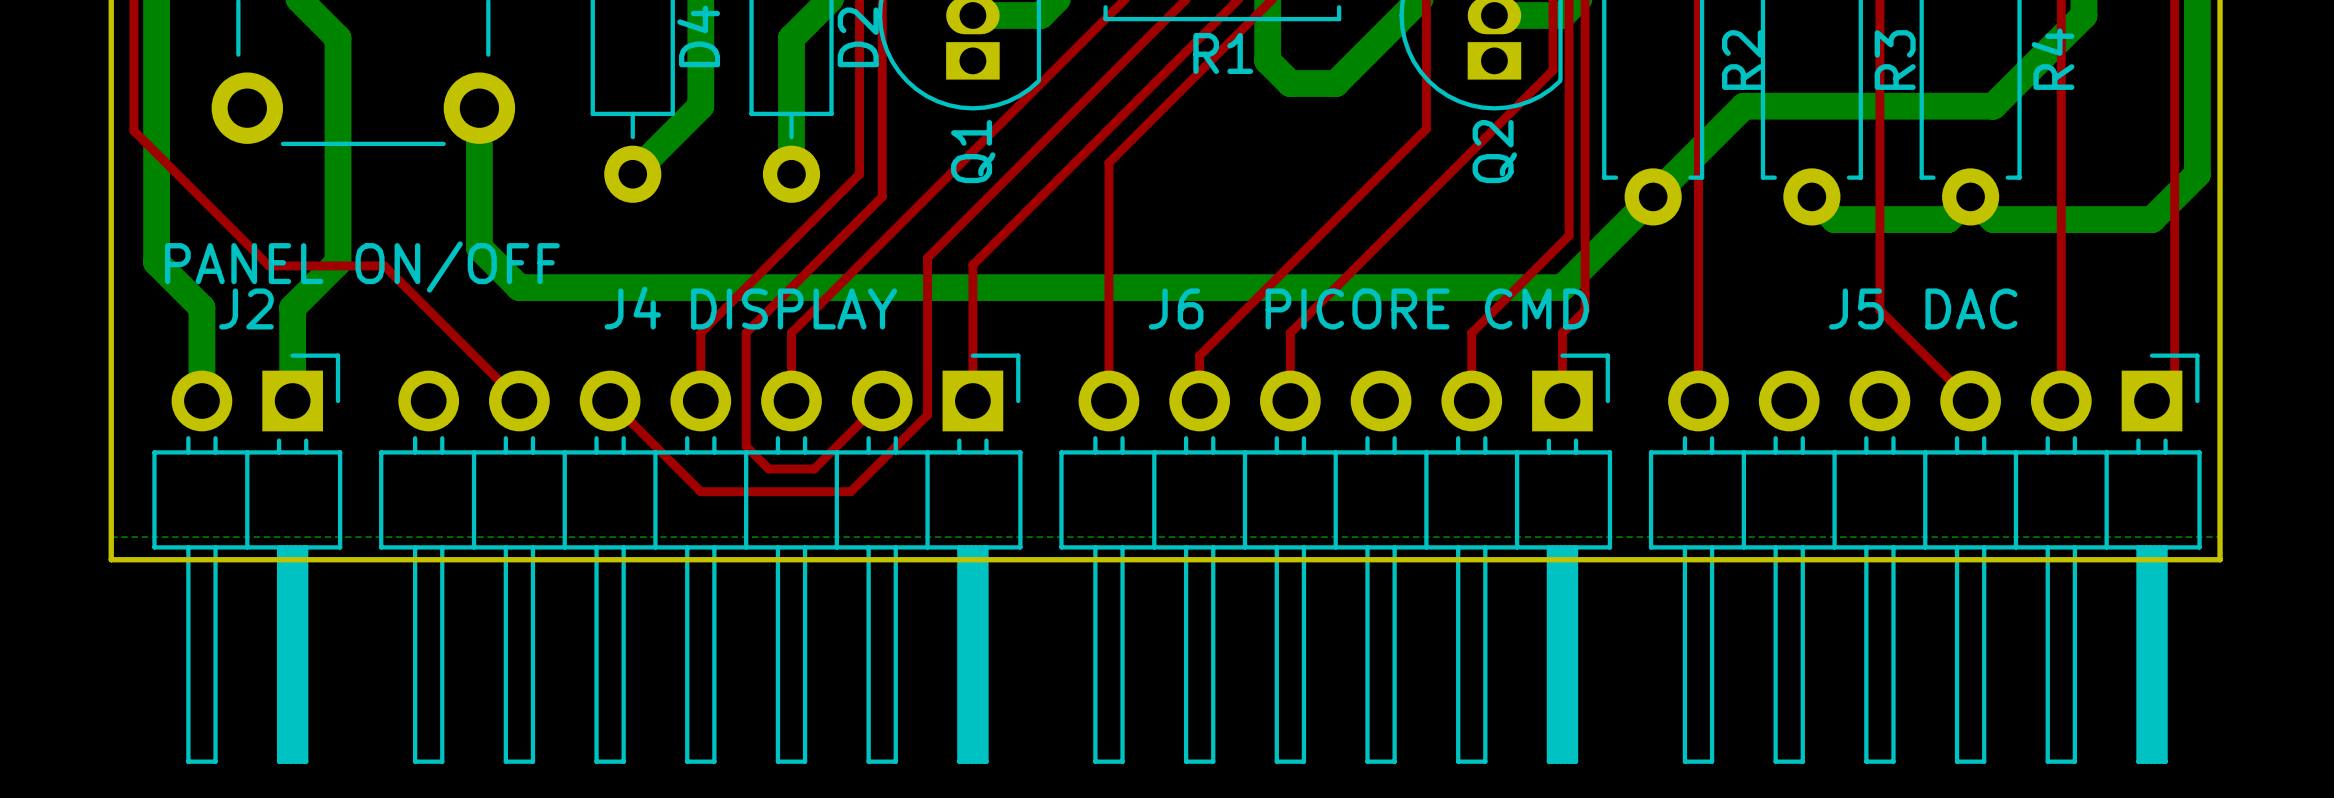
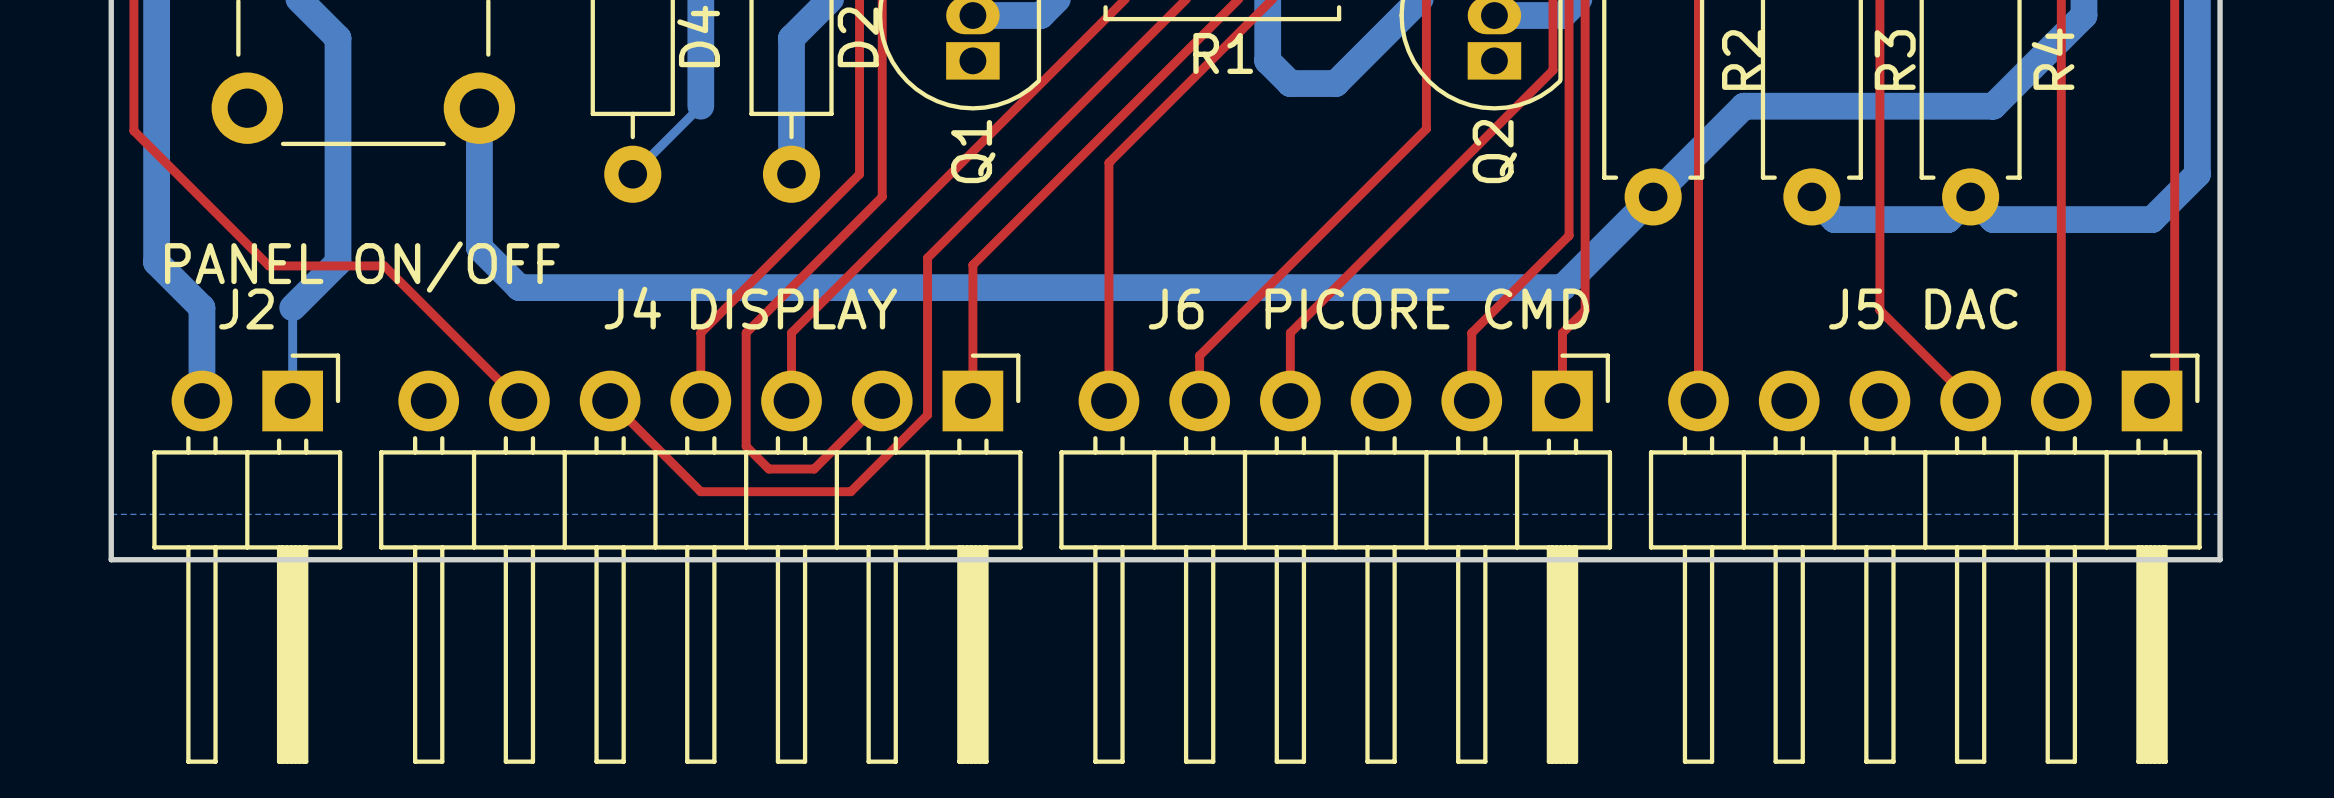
bottom track width: thick (700, 106) (632, 174) -> thin (700, 106) (632, 174)
bottom track width: thick (292, 307) (292, 401) -> thin (292, 307) (292, 401)
bottom zone outline: (111, 514) (111, 537) (2220, 537) (2220, 514) -> (111, 514) (2220, 514)

